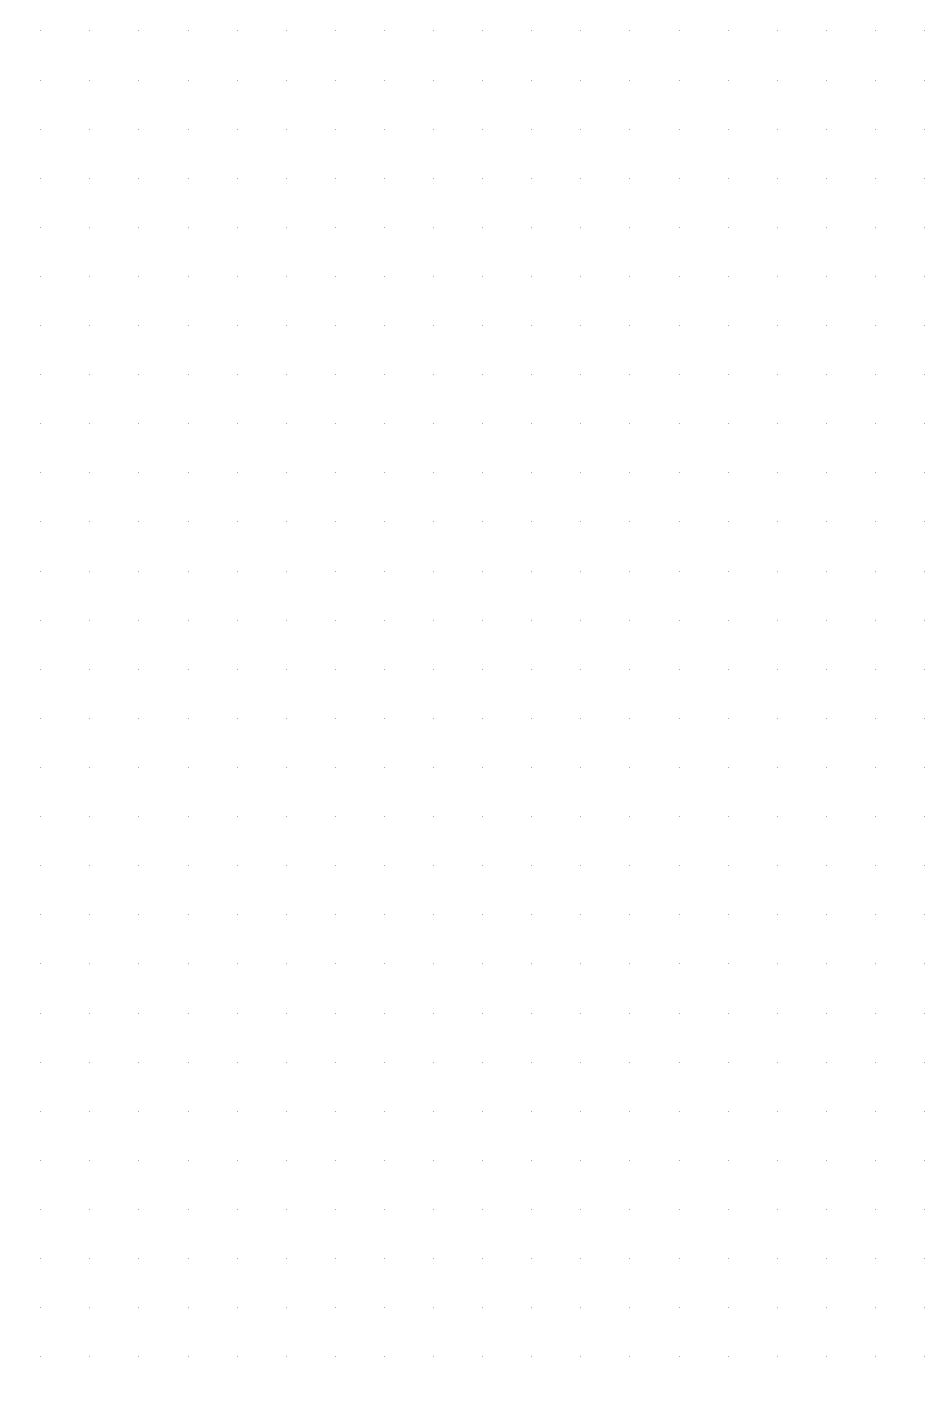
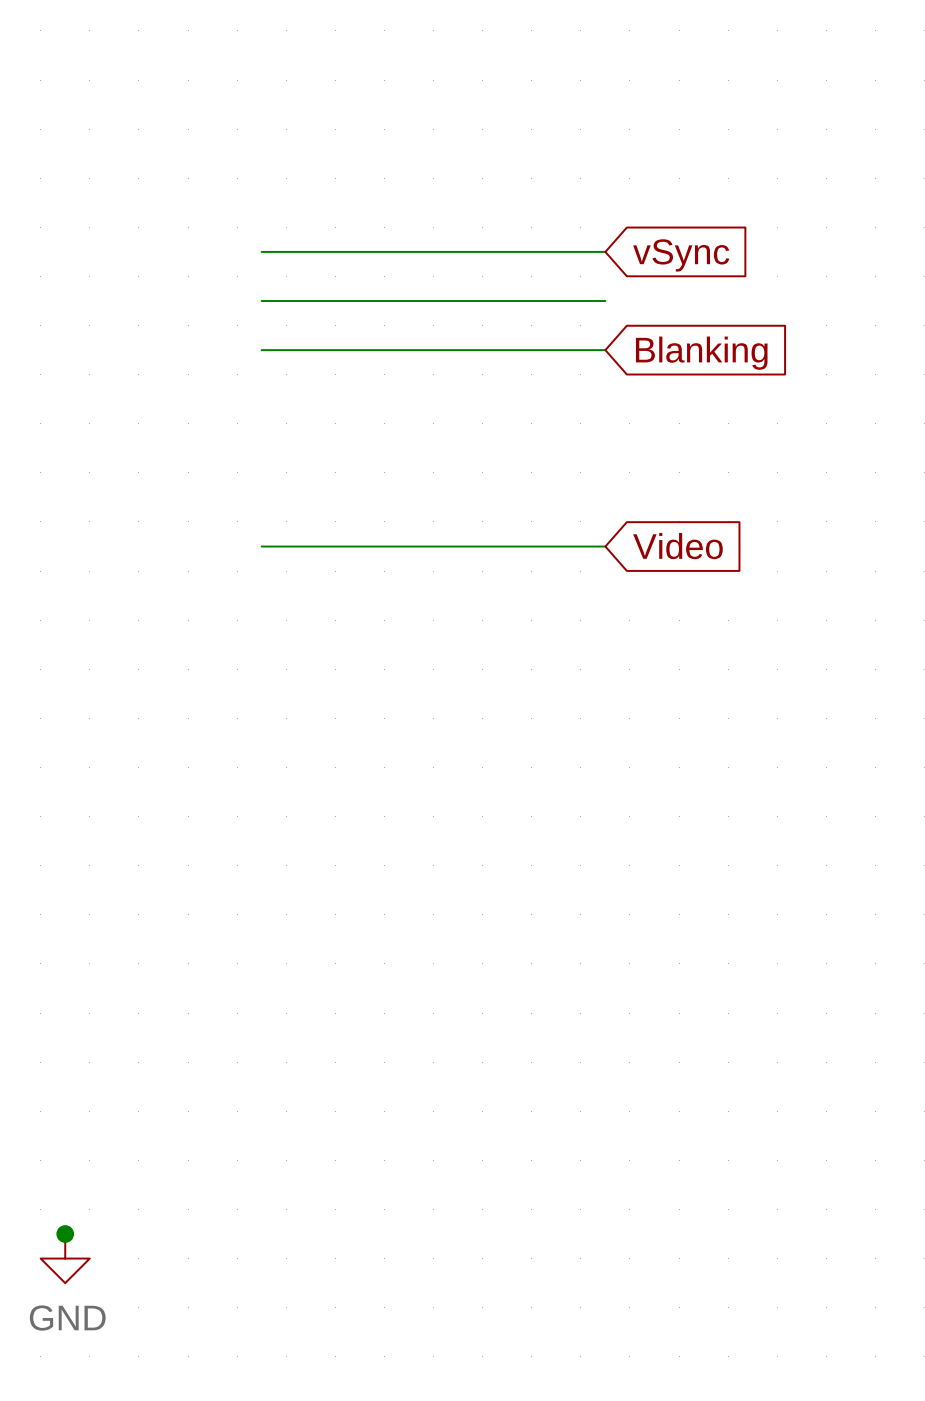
wire: none -> (261, 251) (605, 251)
global label: none -> vSync (681, 255)
wire: none -> (261, 301) (605, 301)
wire: none -> (261, 350) (605, 350)
global label: none -> Blanking (701, 353)
wire: none -> (261, 546) (605, 546)
global label: none -> Video (677, 546)
junction: none -> (65, 1234)
power symbol: none -> GND (65, 1258)

